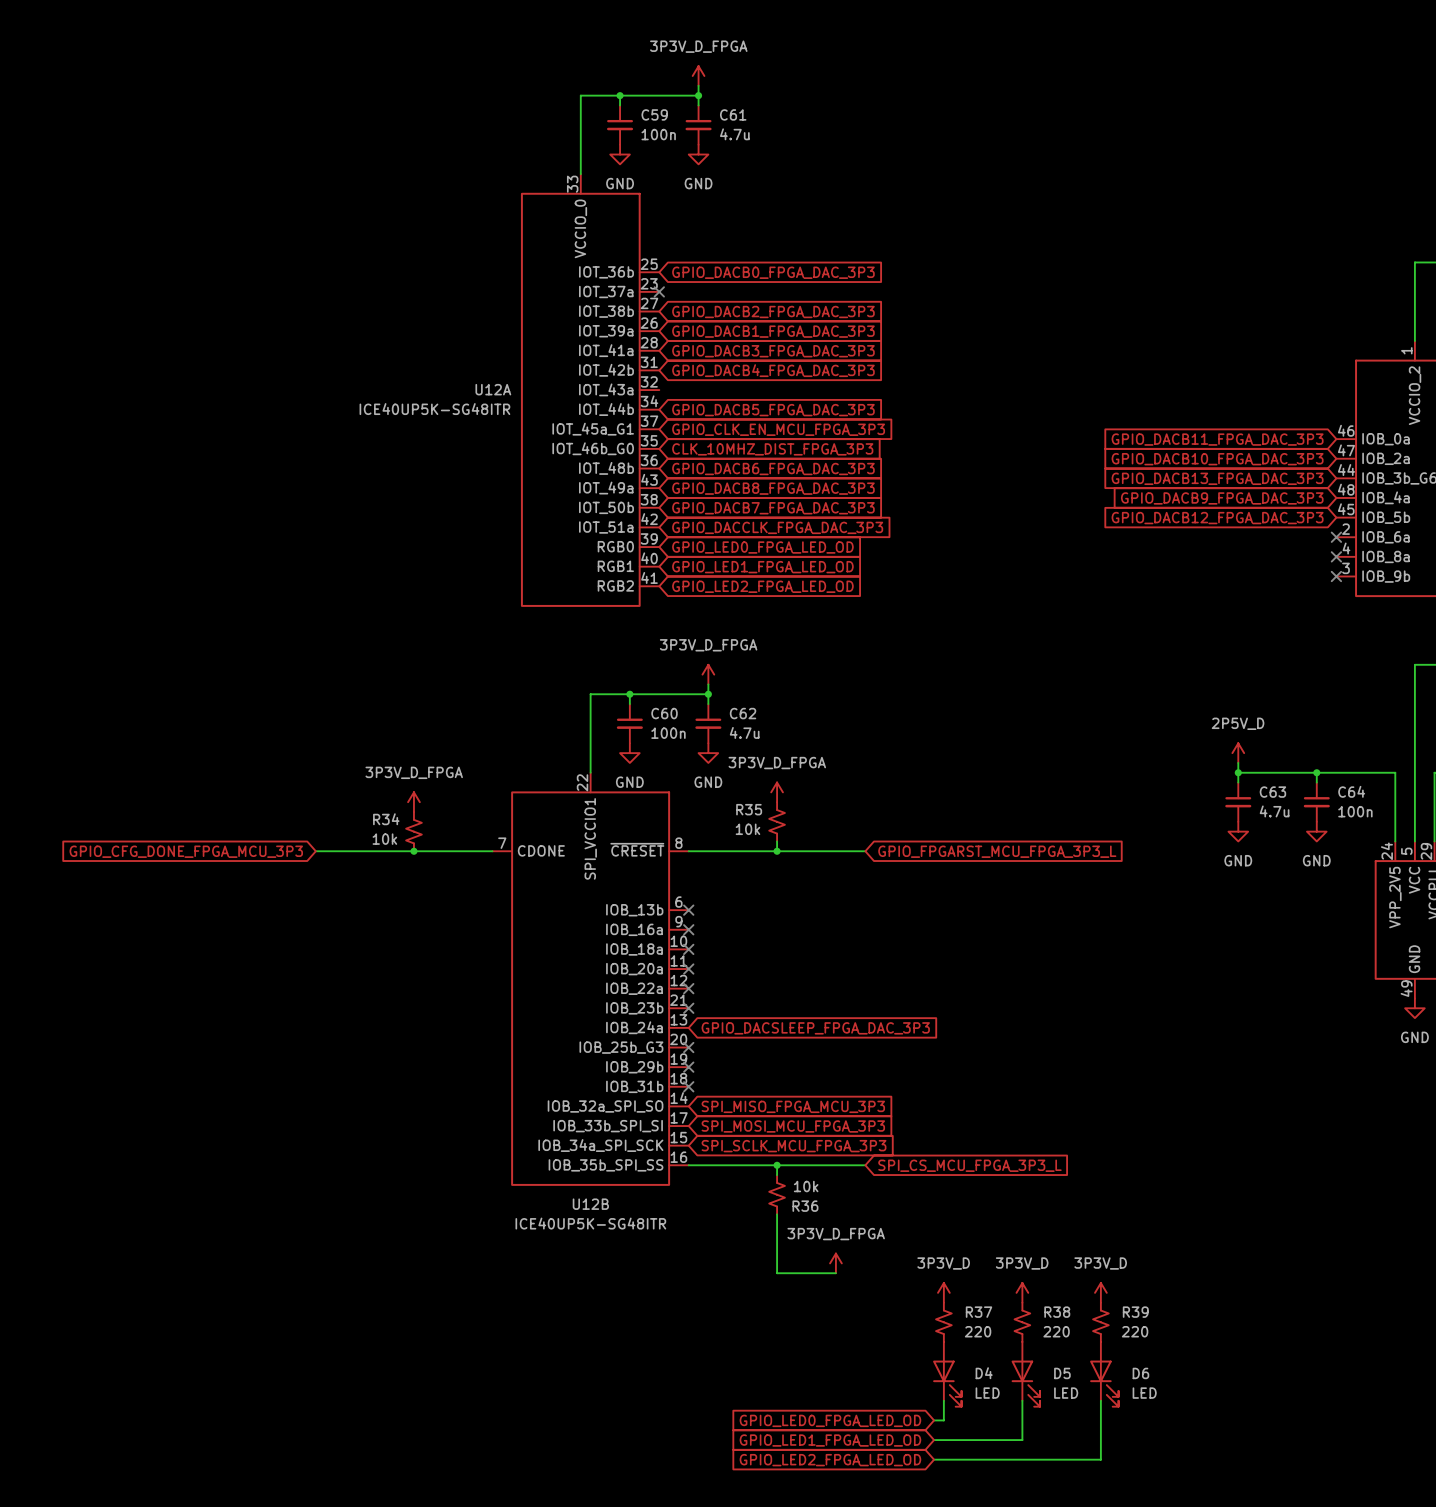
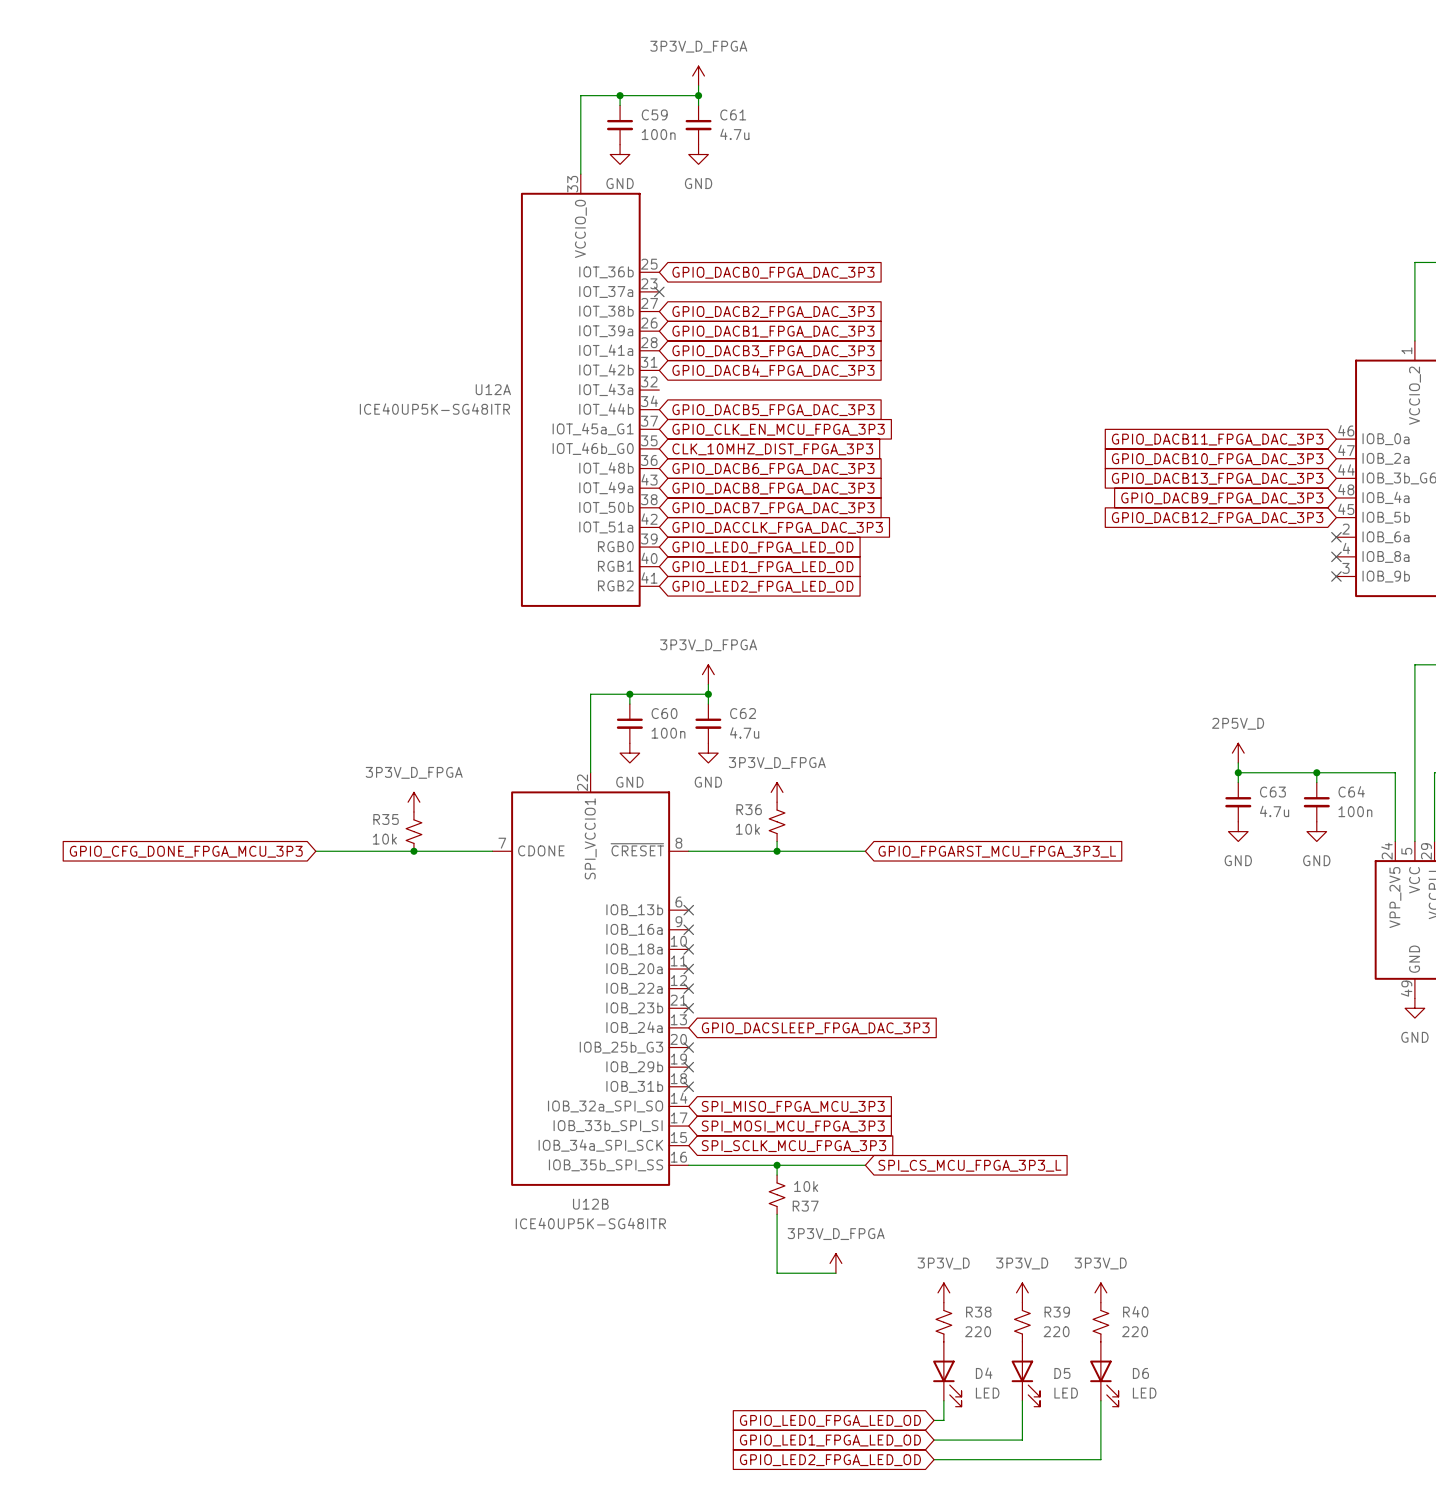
R35 name: R35 (749, 809) -> R36 (749, 809)
R34 name: R34 (386, 819) -> R35 (386, 819)
R36 name: R36 (805, 1206) -> R37 (805, 1206)
R37 name: R37 (979, 1312) -> R38 (978, 1312)
R38 name: R38 (1057, 1312) -> R39 (1057, 1312)
R39 name: R39 (1135, 1312) -> R40 (1135, 1311)

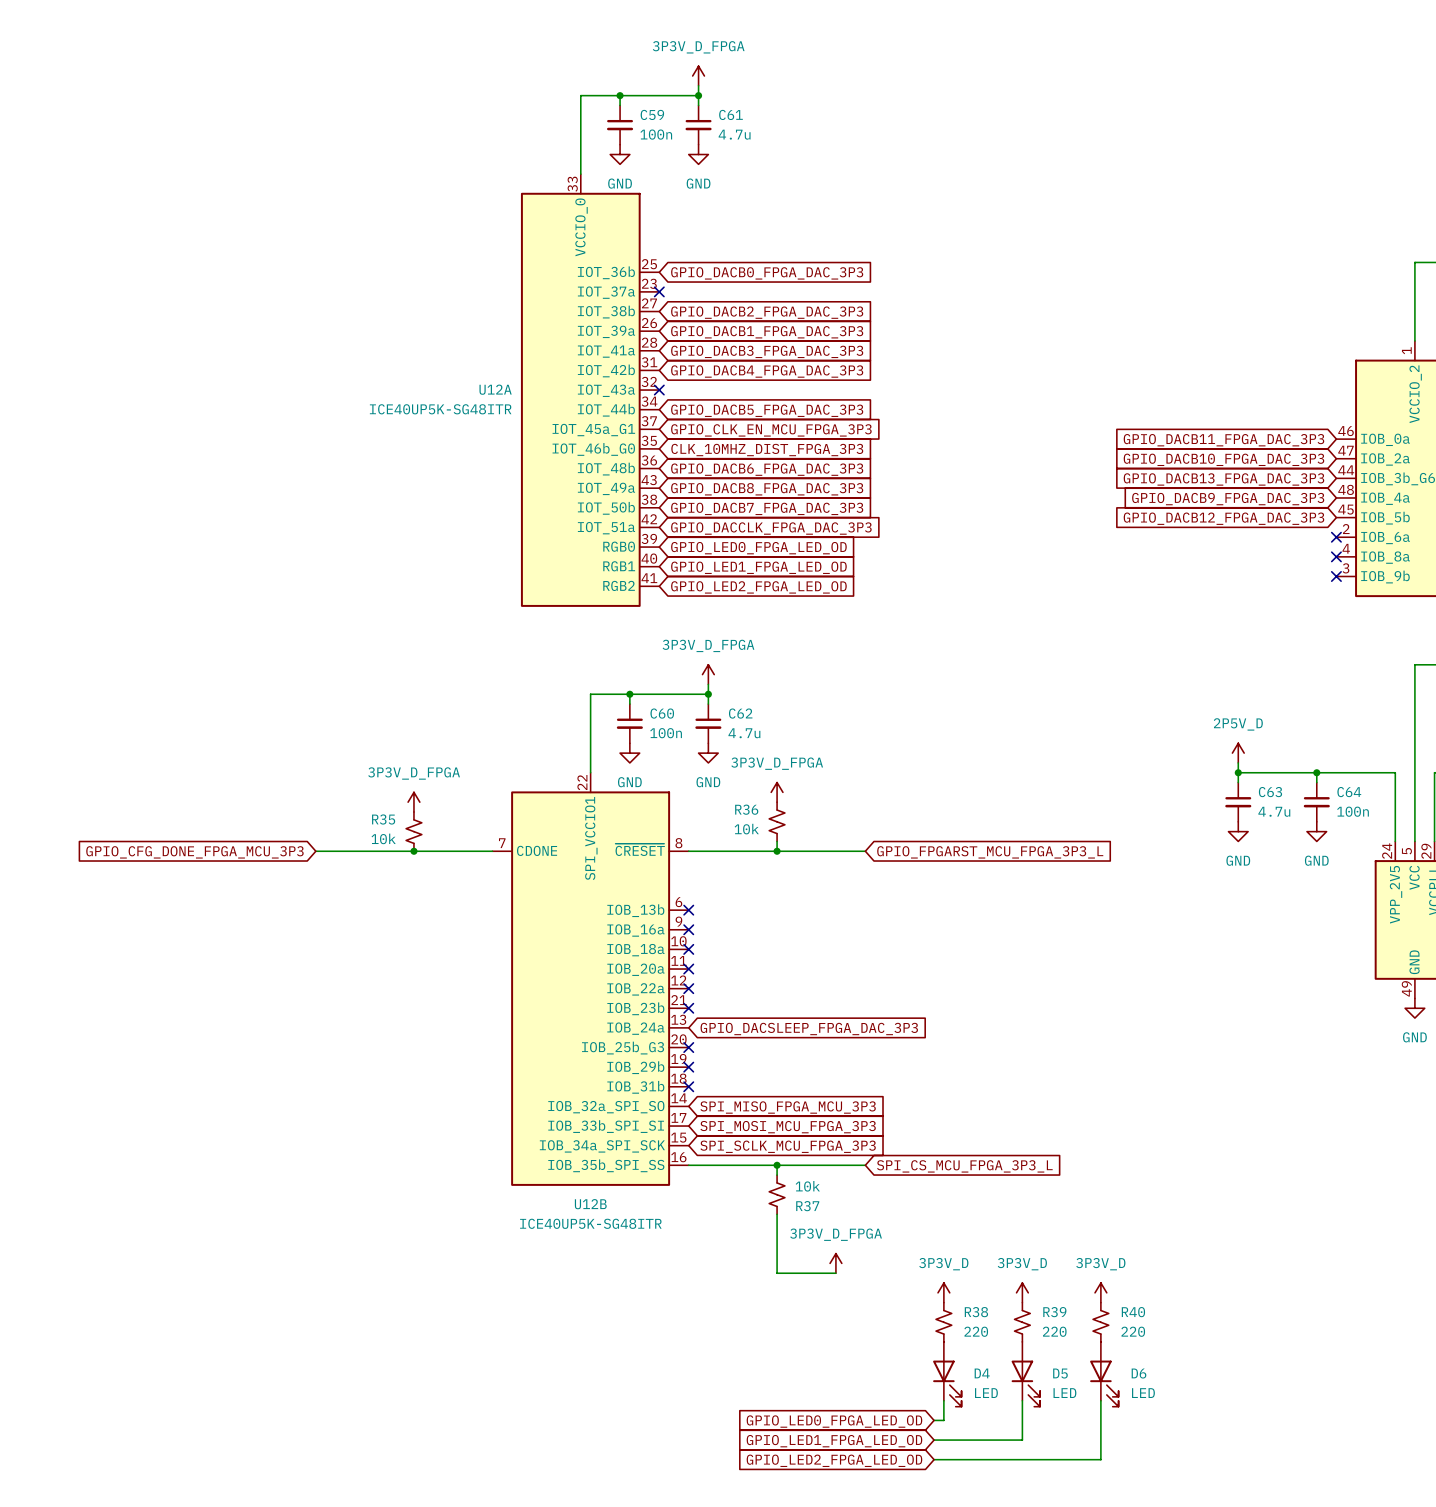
no-connect mark: none -> (659, 390)

